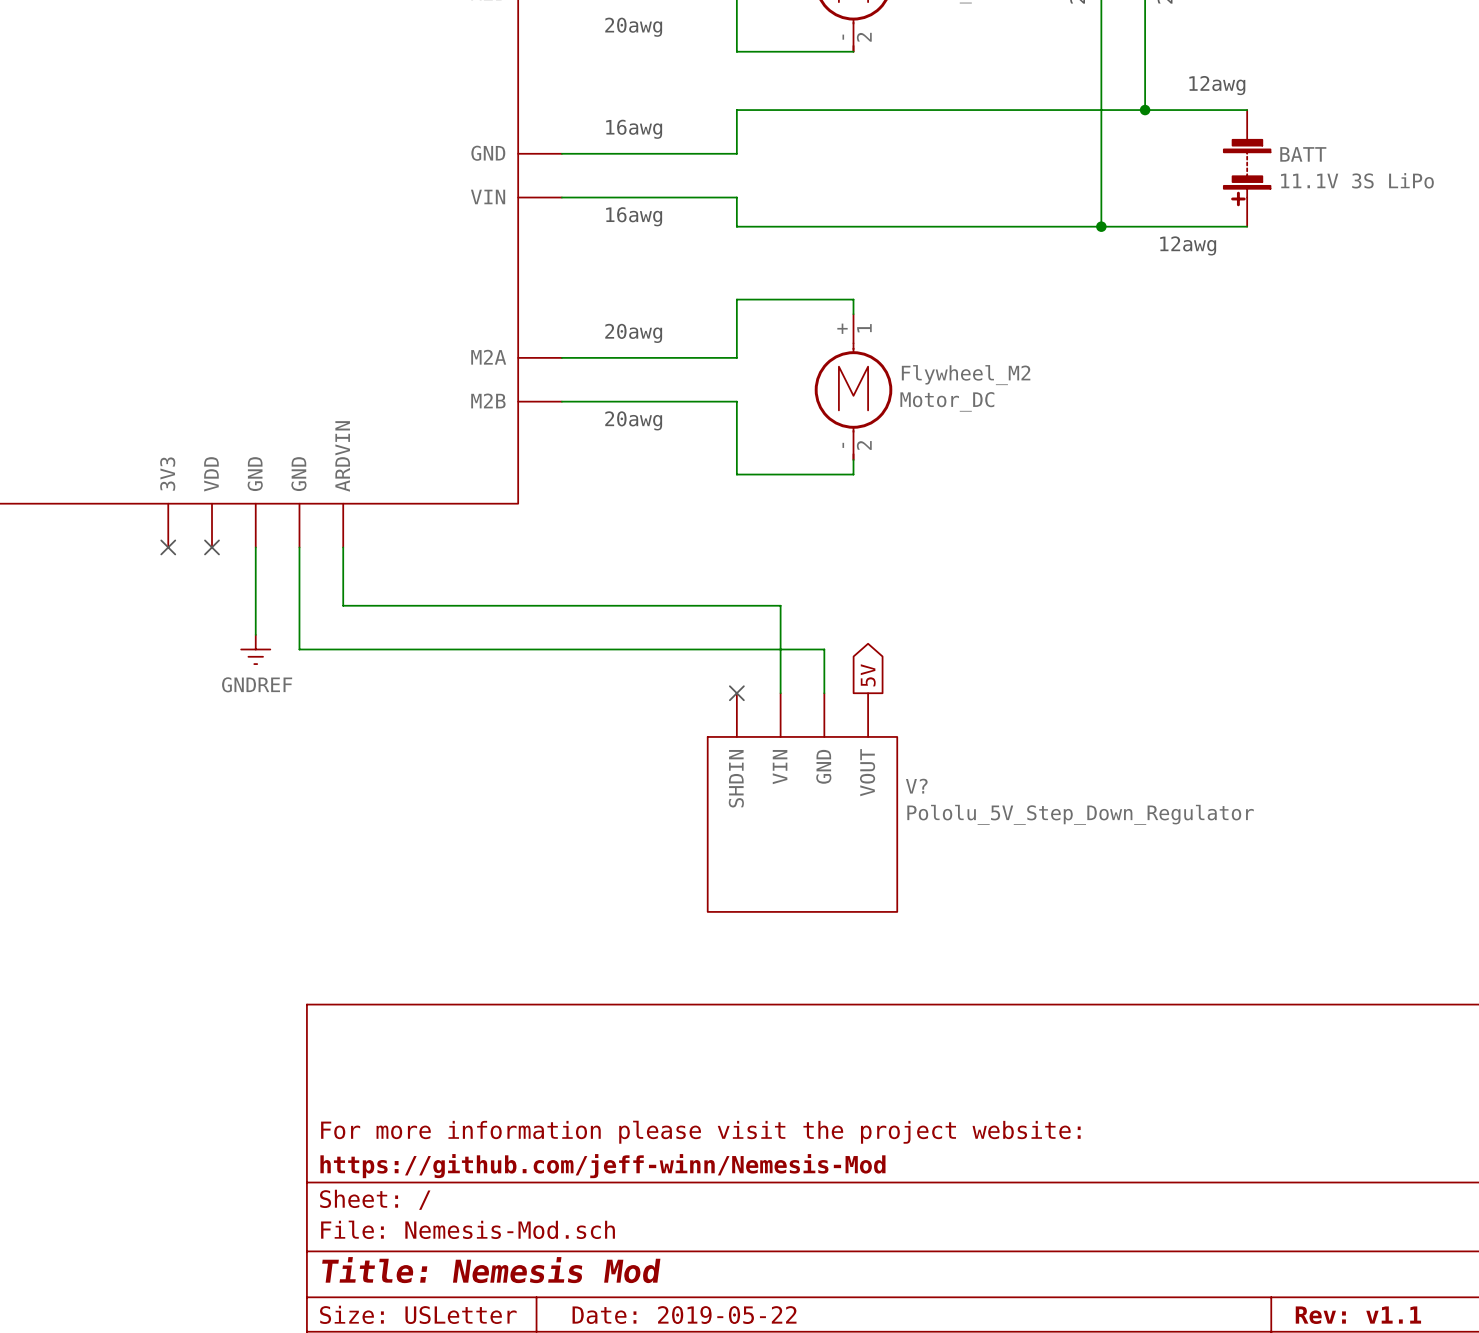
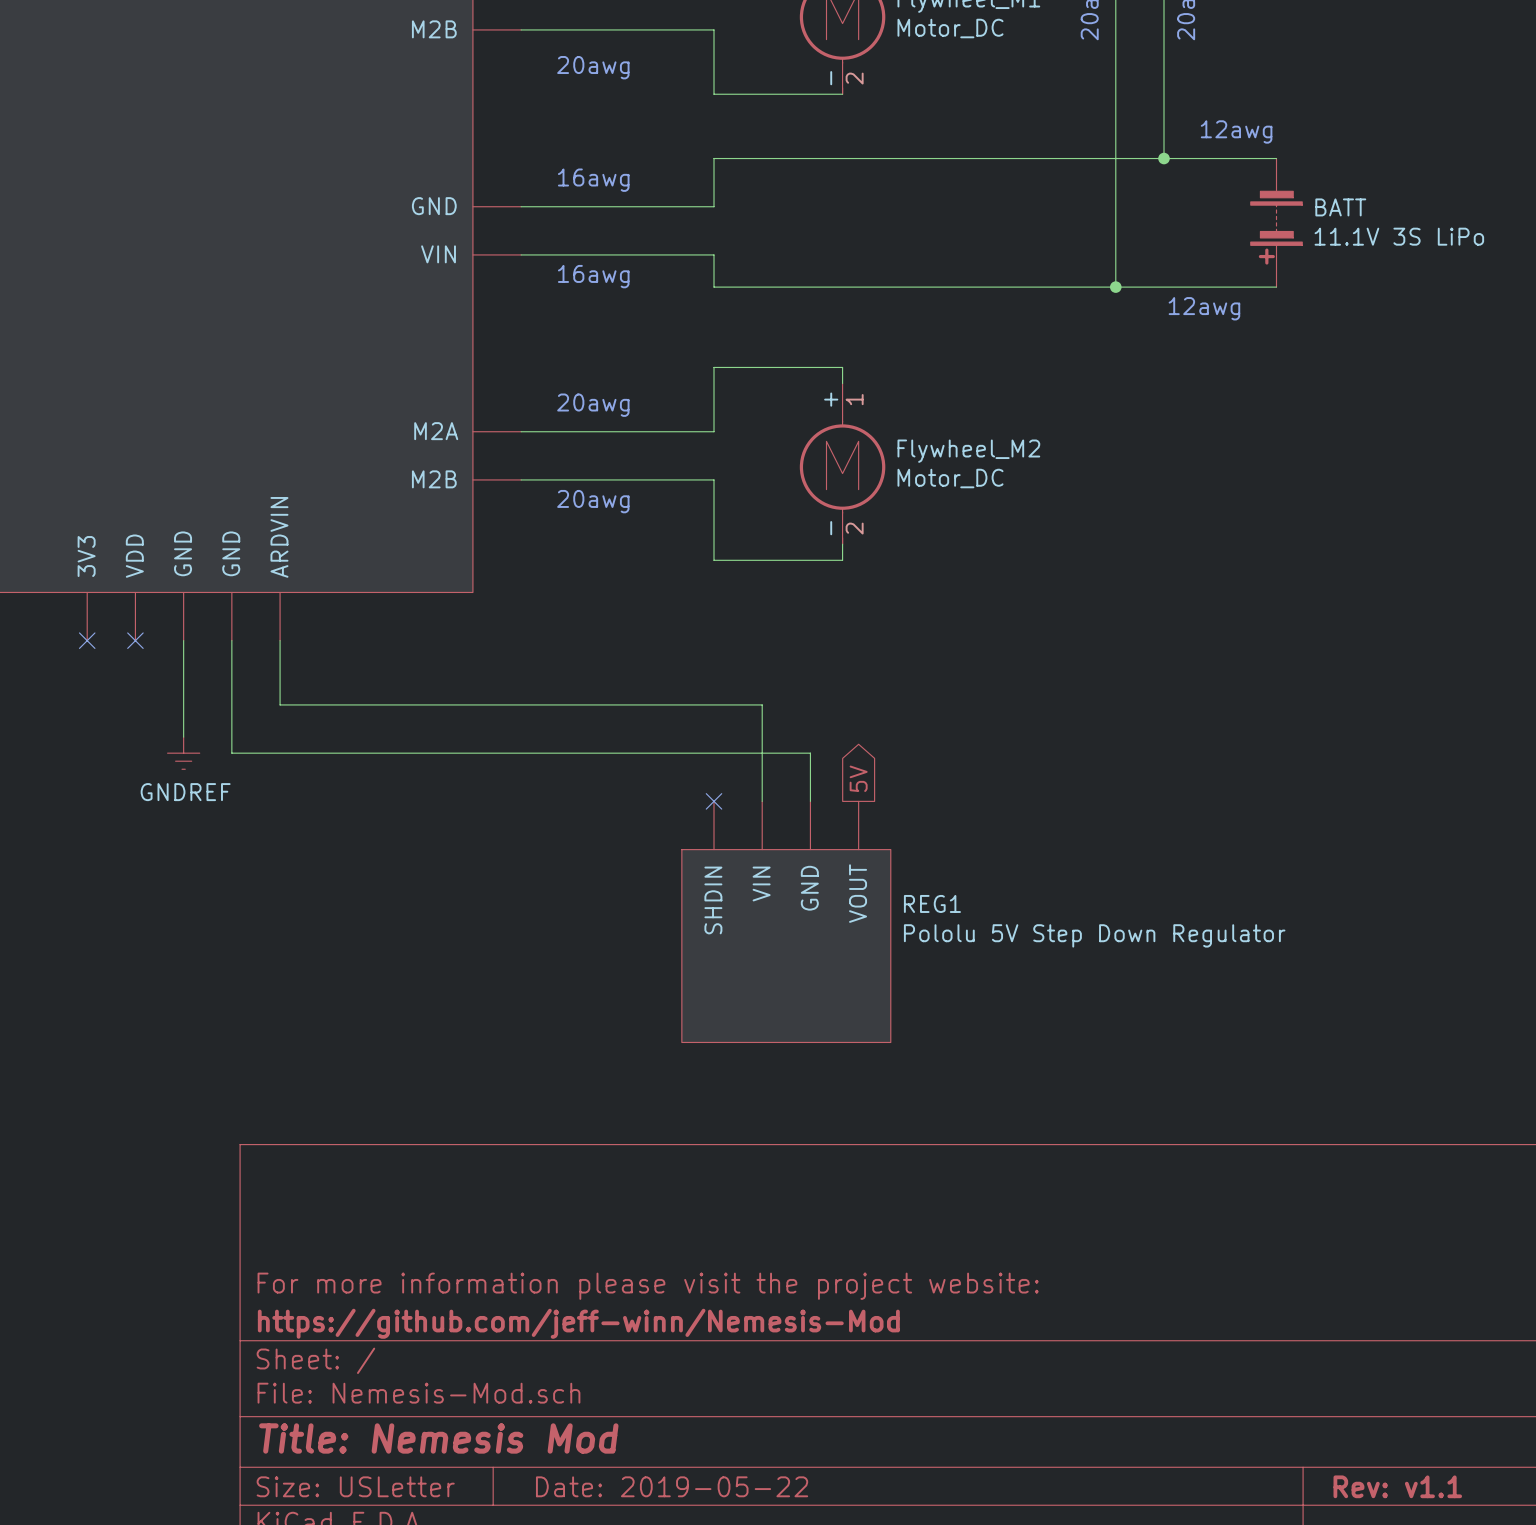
V? name: V? (916, 786) -> REG1 (932, 903)
V? value: Pololu_5V_Step_Down_Regulator (1080, 814) -> Pololu 5V Step Down Regulator (1094, 935)

